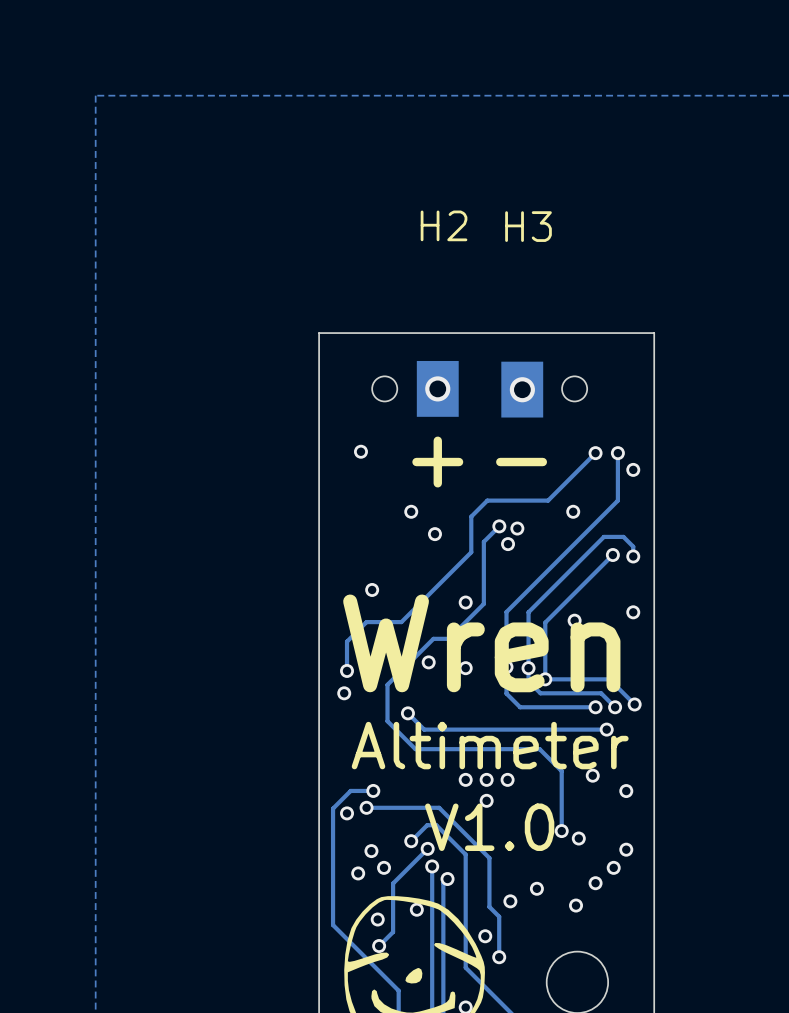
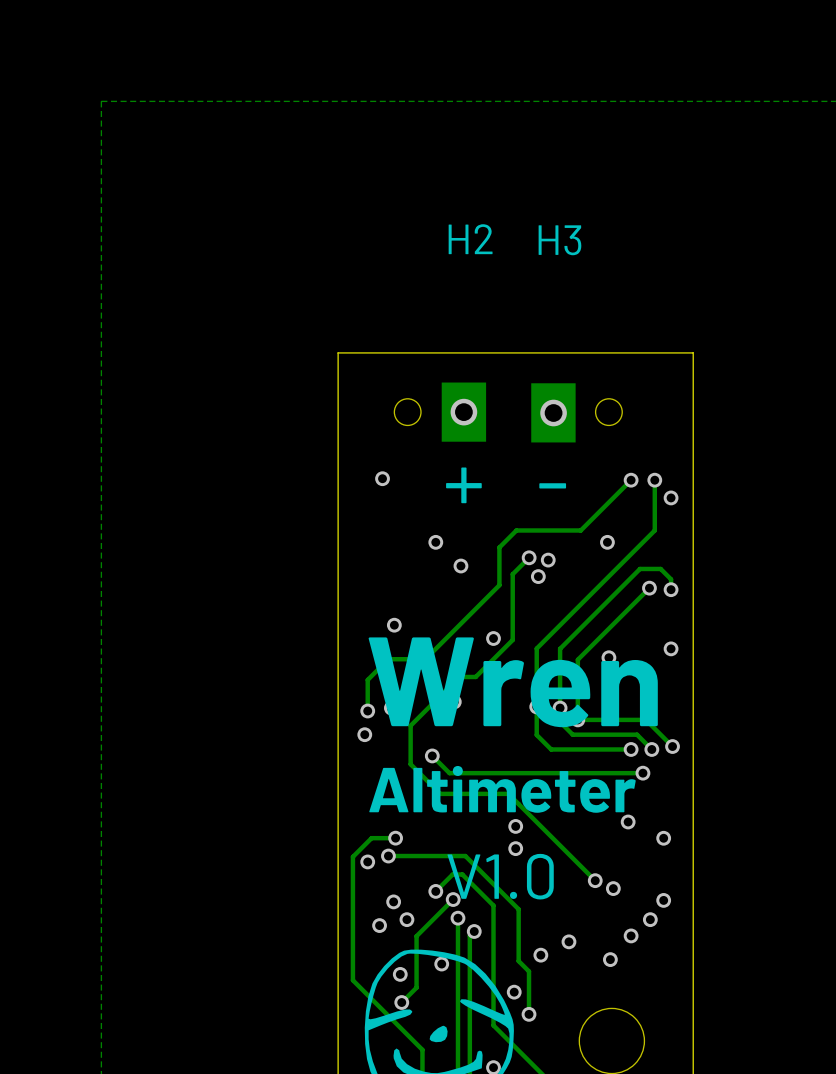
track: (479, 749) (539, 749) (561, 771) (561, 831) -> (508, 793) (595, 880)
via: (465, 779) -> none
via: (507, 779) -> none

